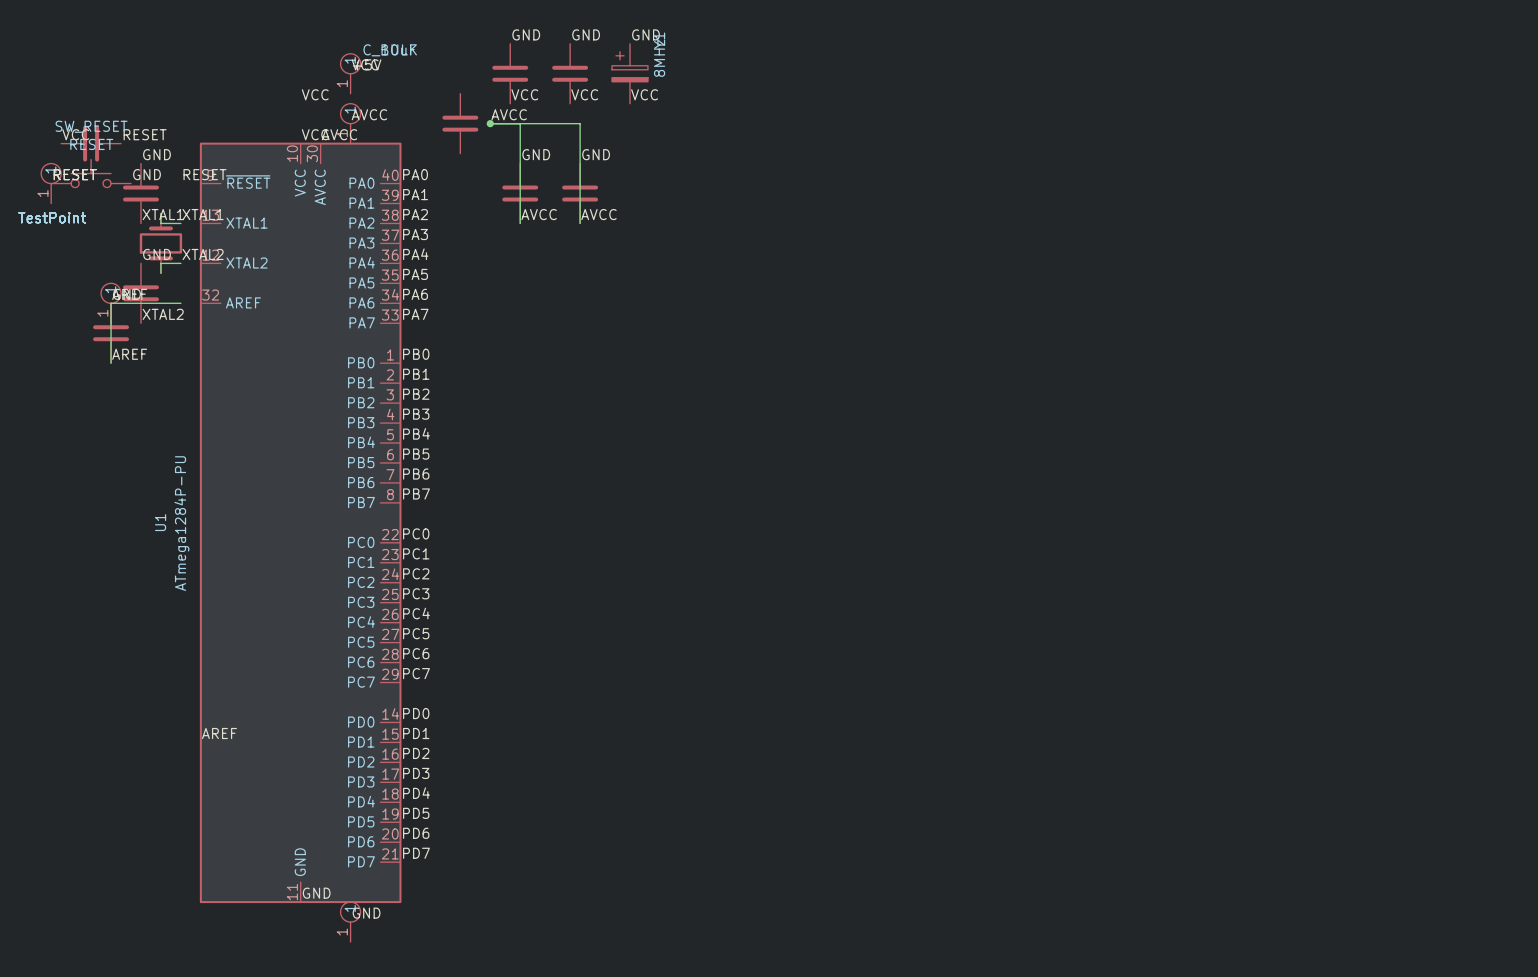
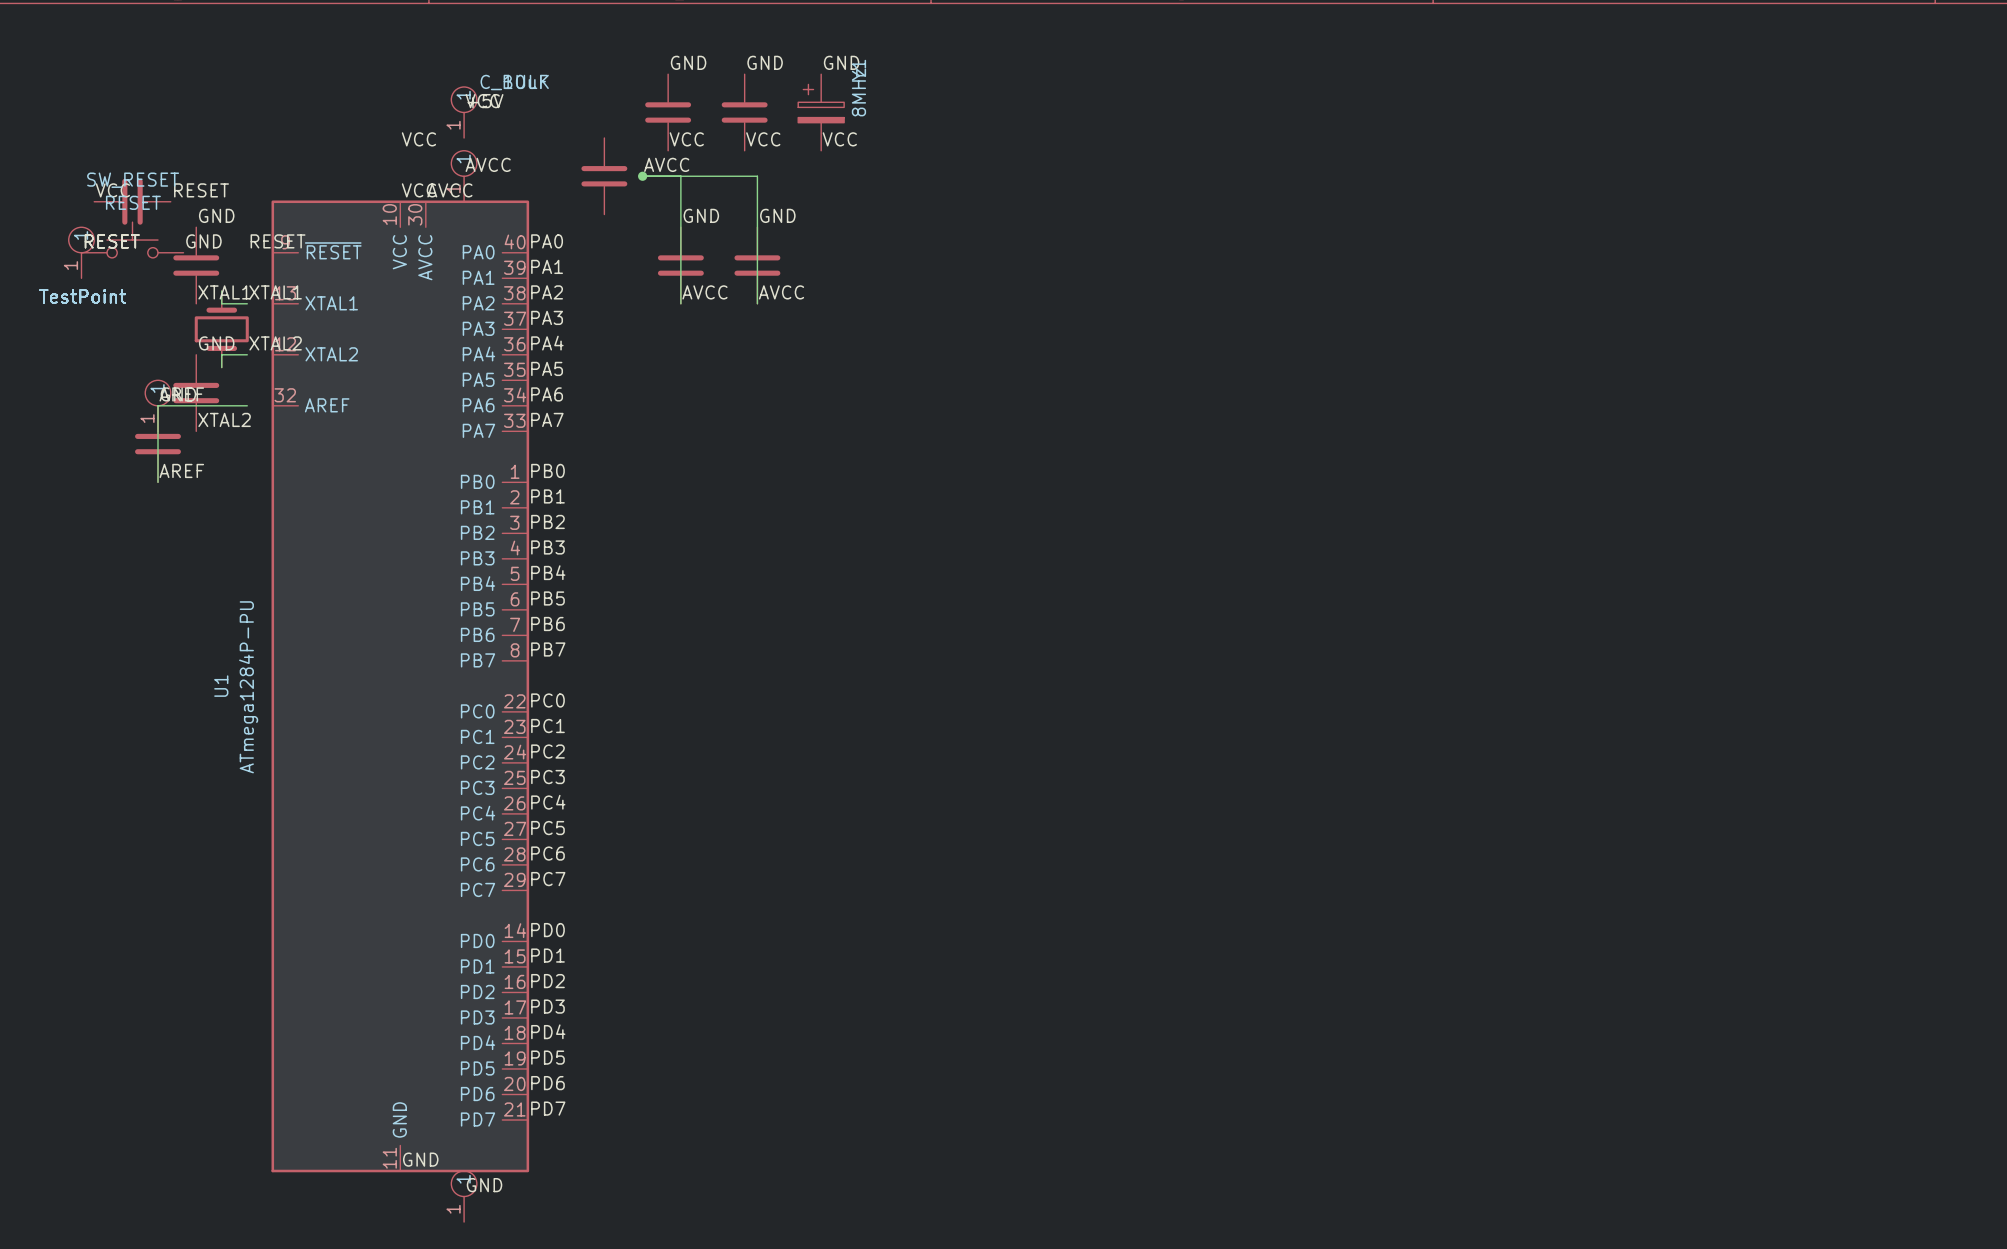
label: AREF (219, 733) -> none

